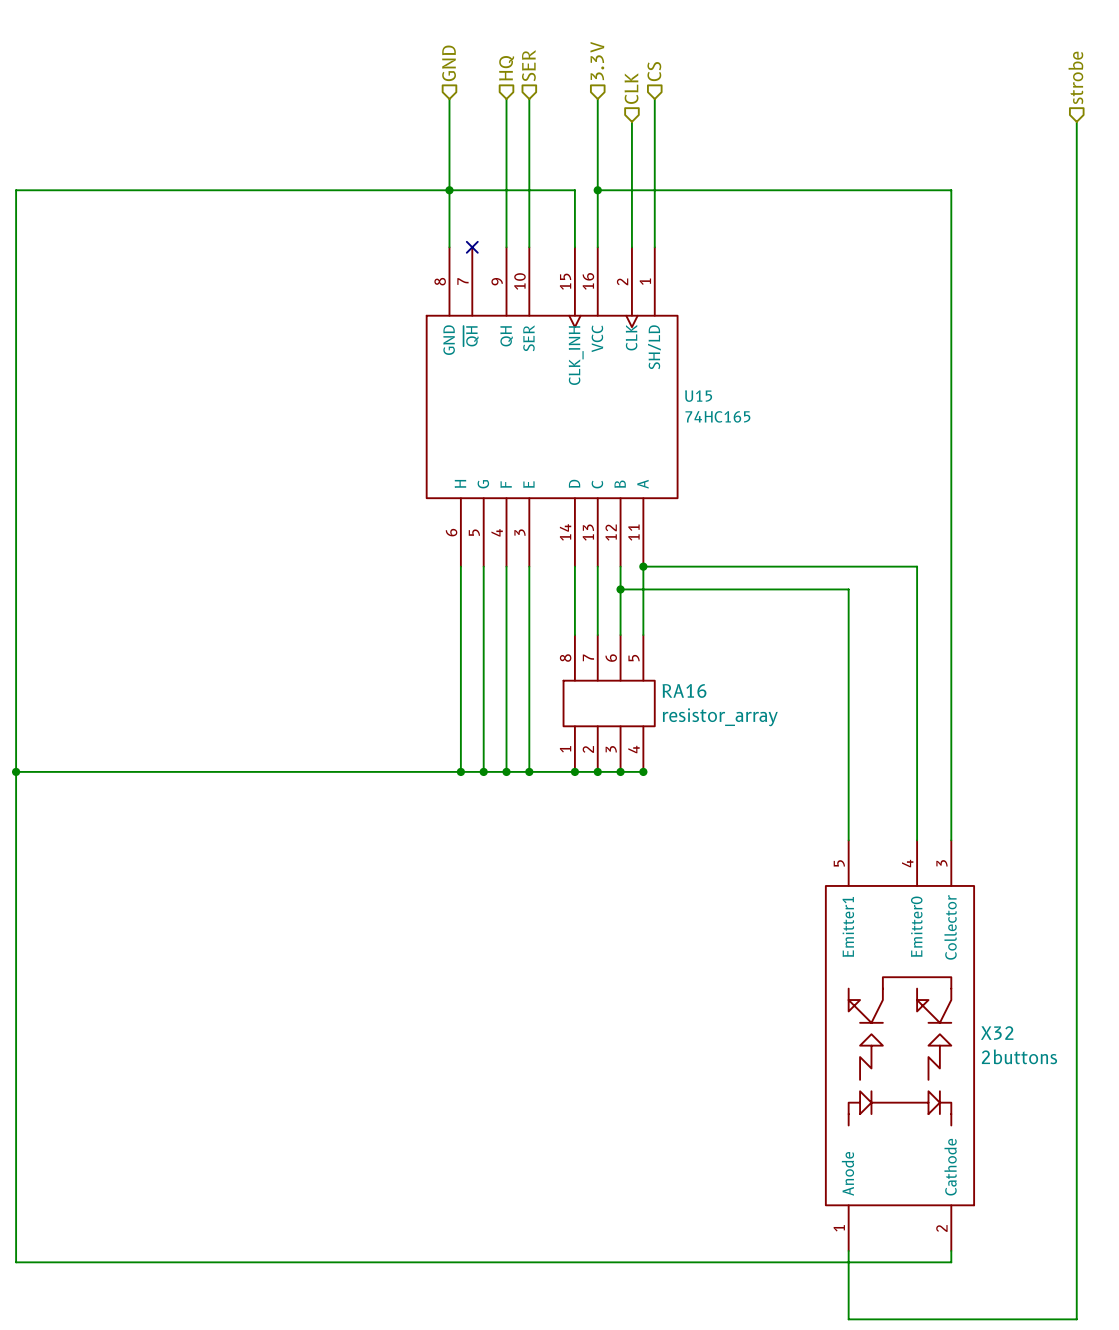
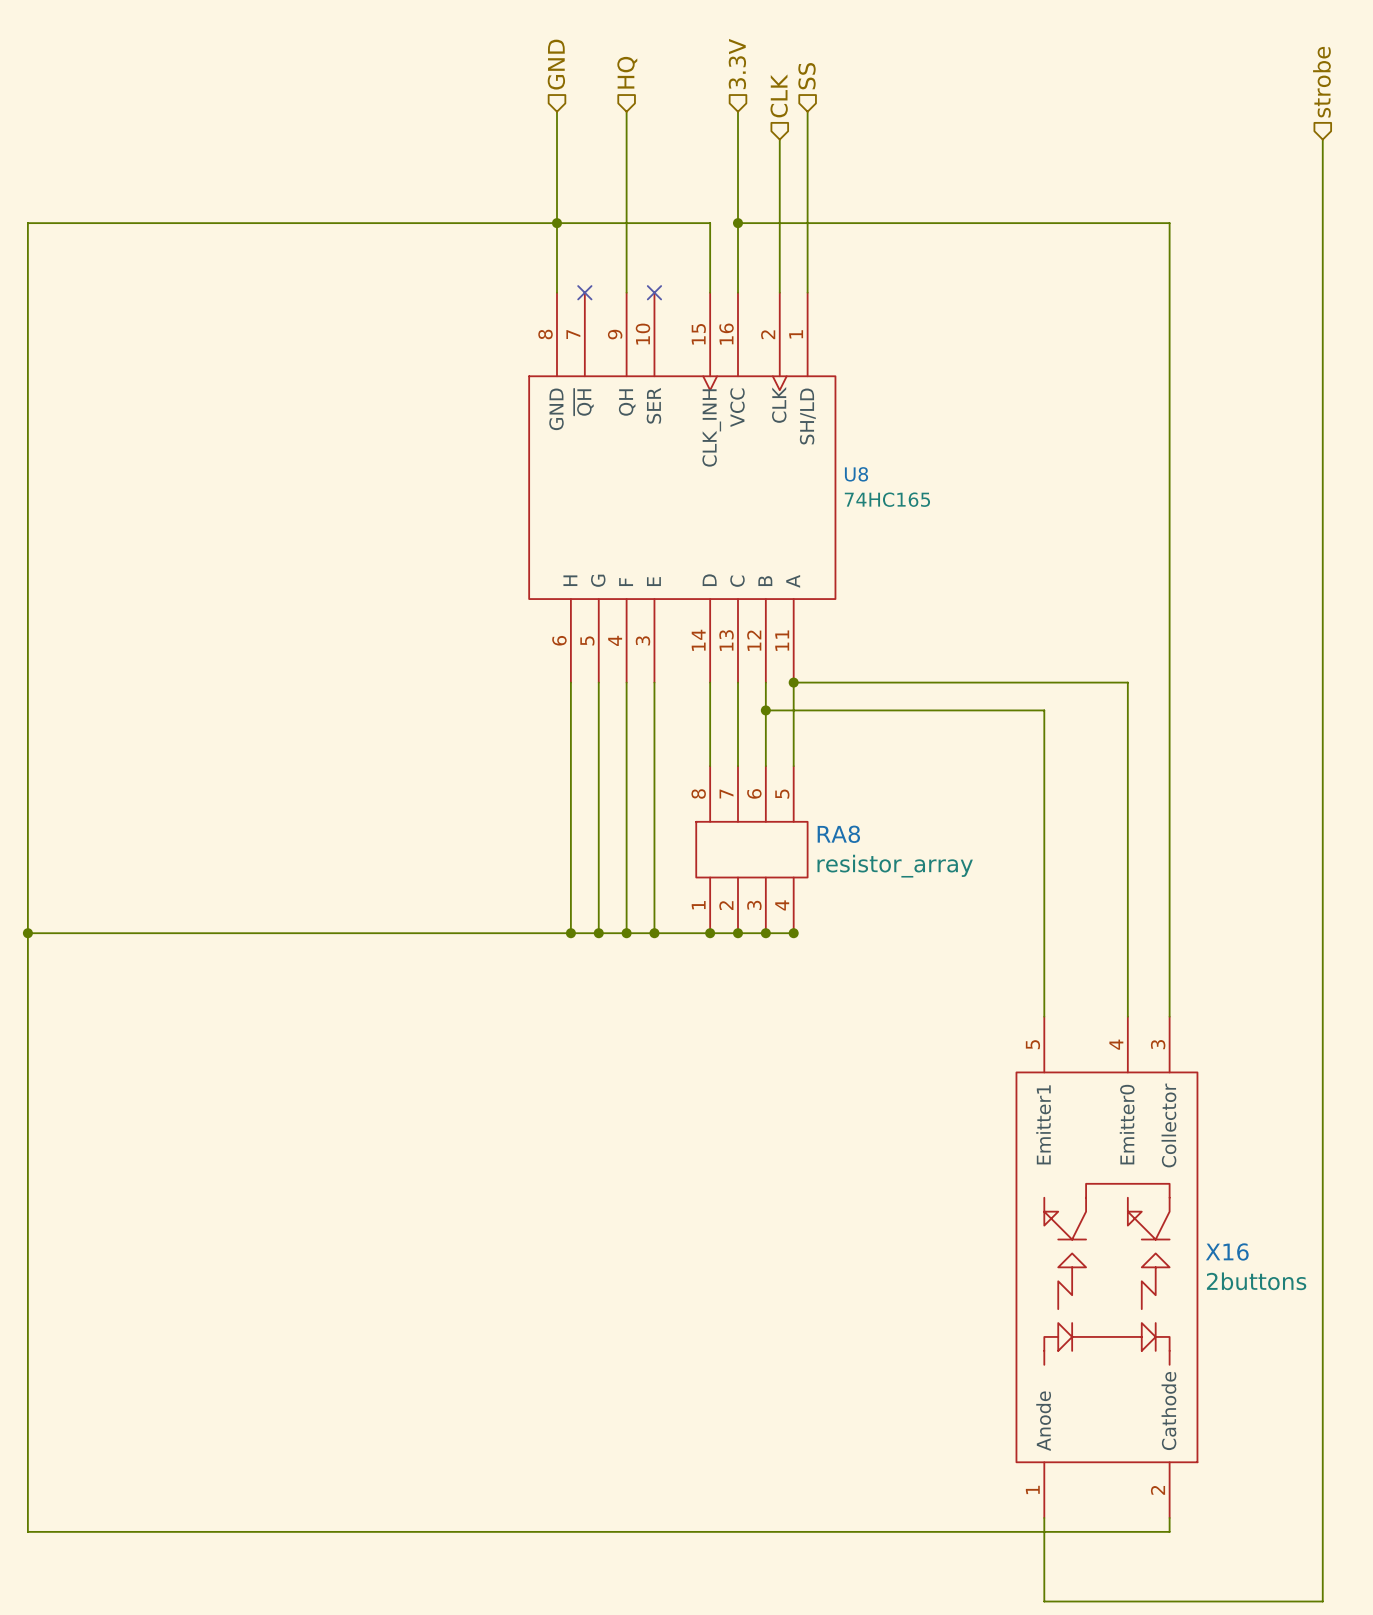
hierarchical label: SER (528, 65) -> none
hierarchical label: CS (654, 71) -> SS (807, 76)
wire: (529, 99) (529, 247) -> none
no-connect mark: none -> (654, 292)
U15 name: U15 (698, 396) -> U8 (856, 474)
RA16 name: RA16 (684, 690) -> RA8 (838, 834)
X32 name: X32 (997, 1033) -> X16 (1227, 1251)

